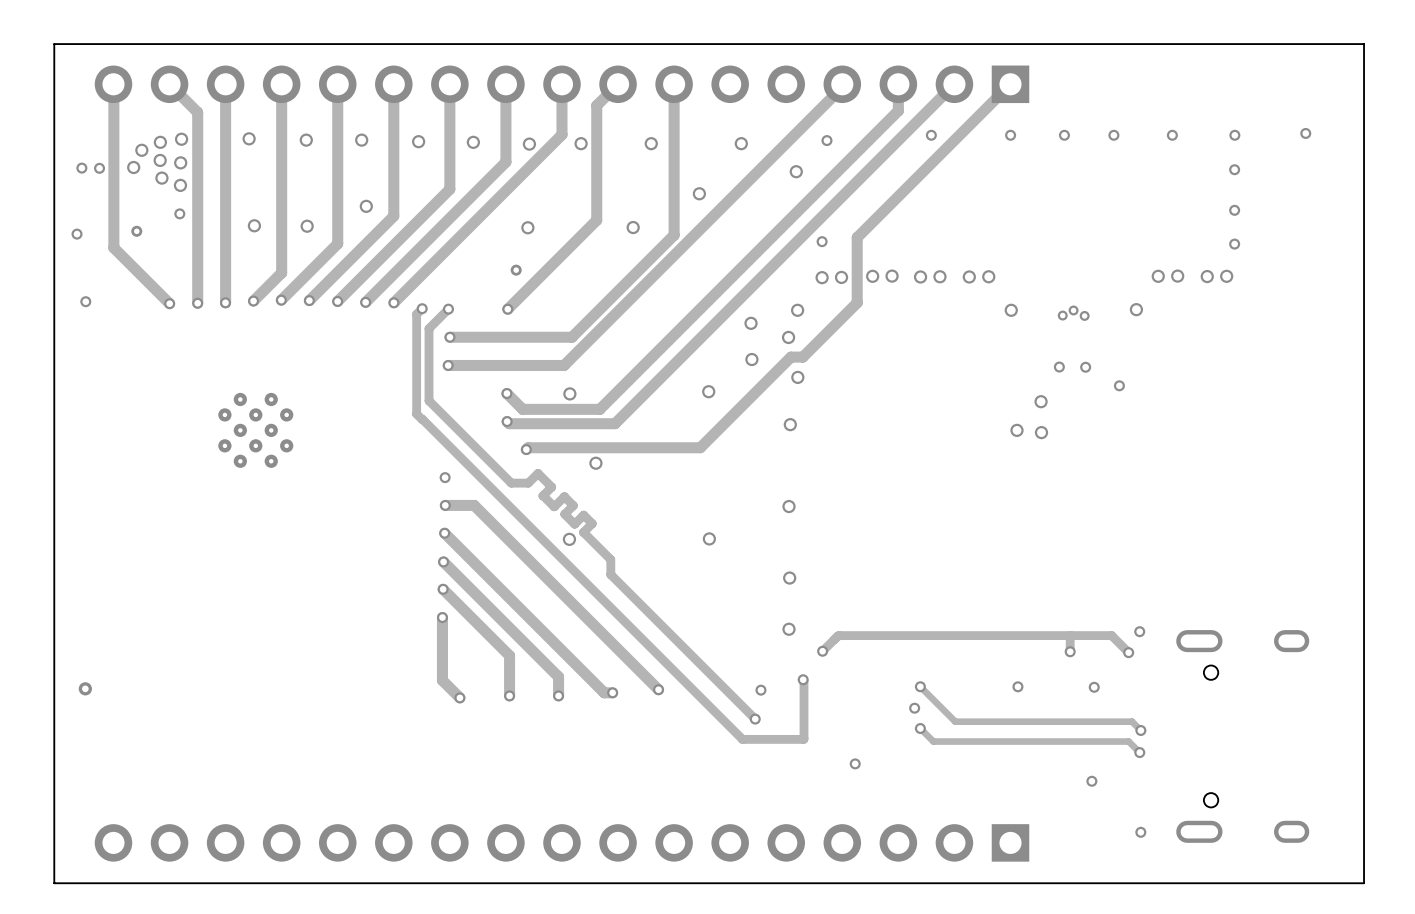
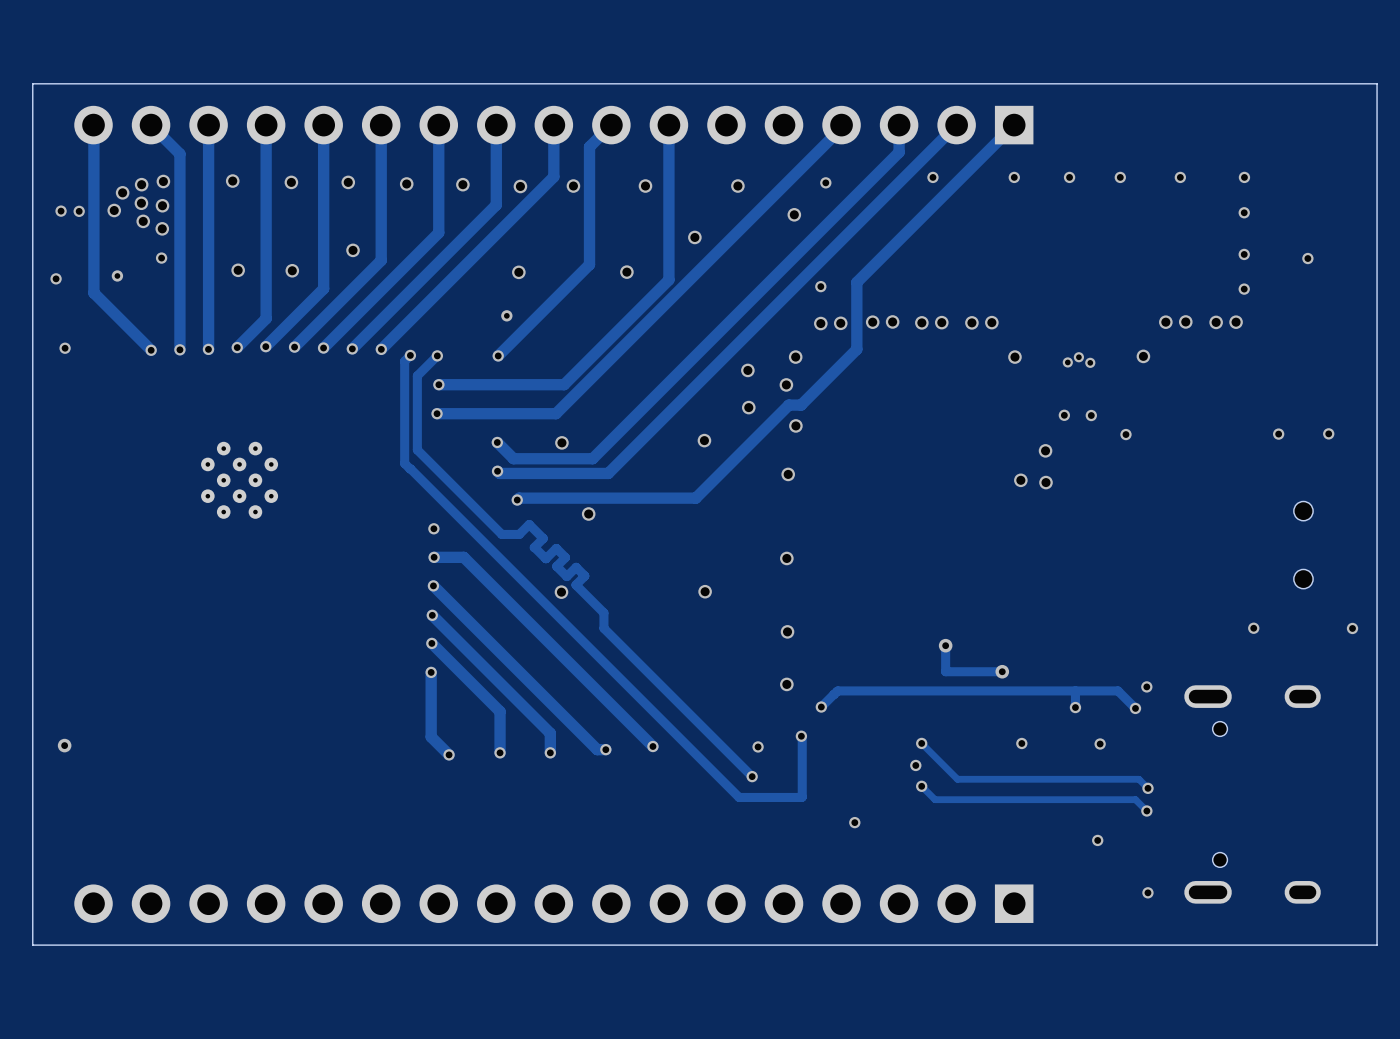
via position: (1305, 133) -> (1307, 258)
via: none -> (1278, 434)
via: none -> (1328, 433)
part: none -> (1303, 545)
via: none -> (1253, 628)
via: none -> (1352, 628)
track: none -> (945, 645) (945, 671) (1002, 671)
via: none -> (945, 645)
via: none -> (1002, 671)

